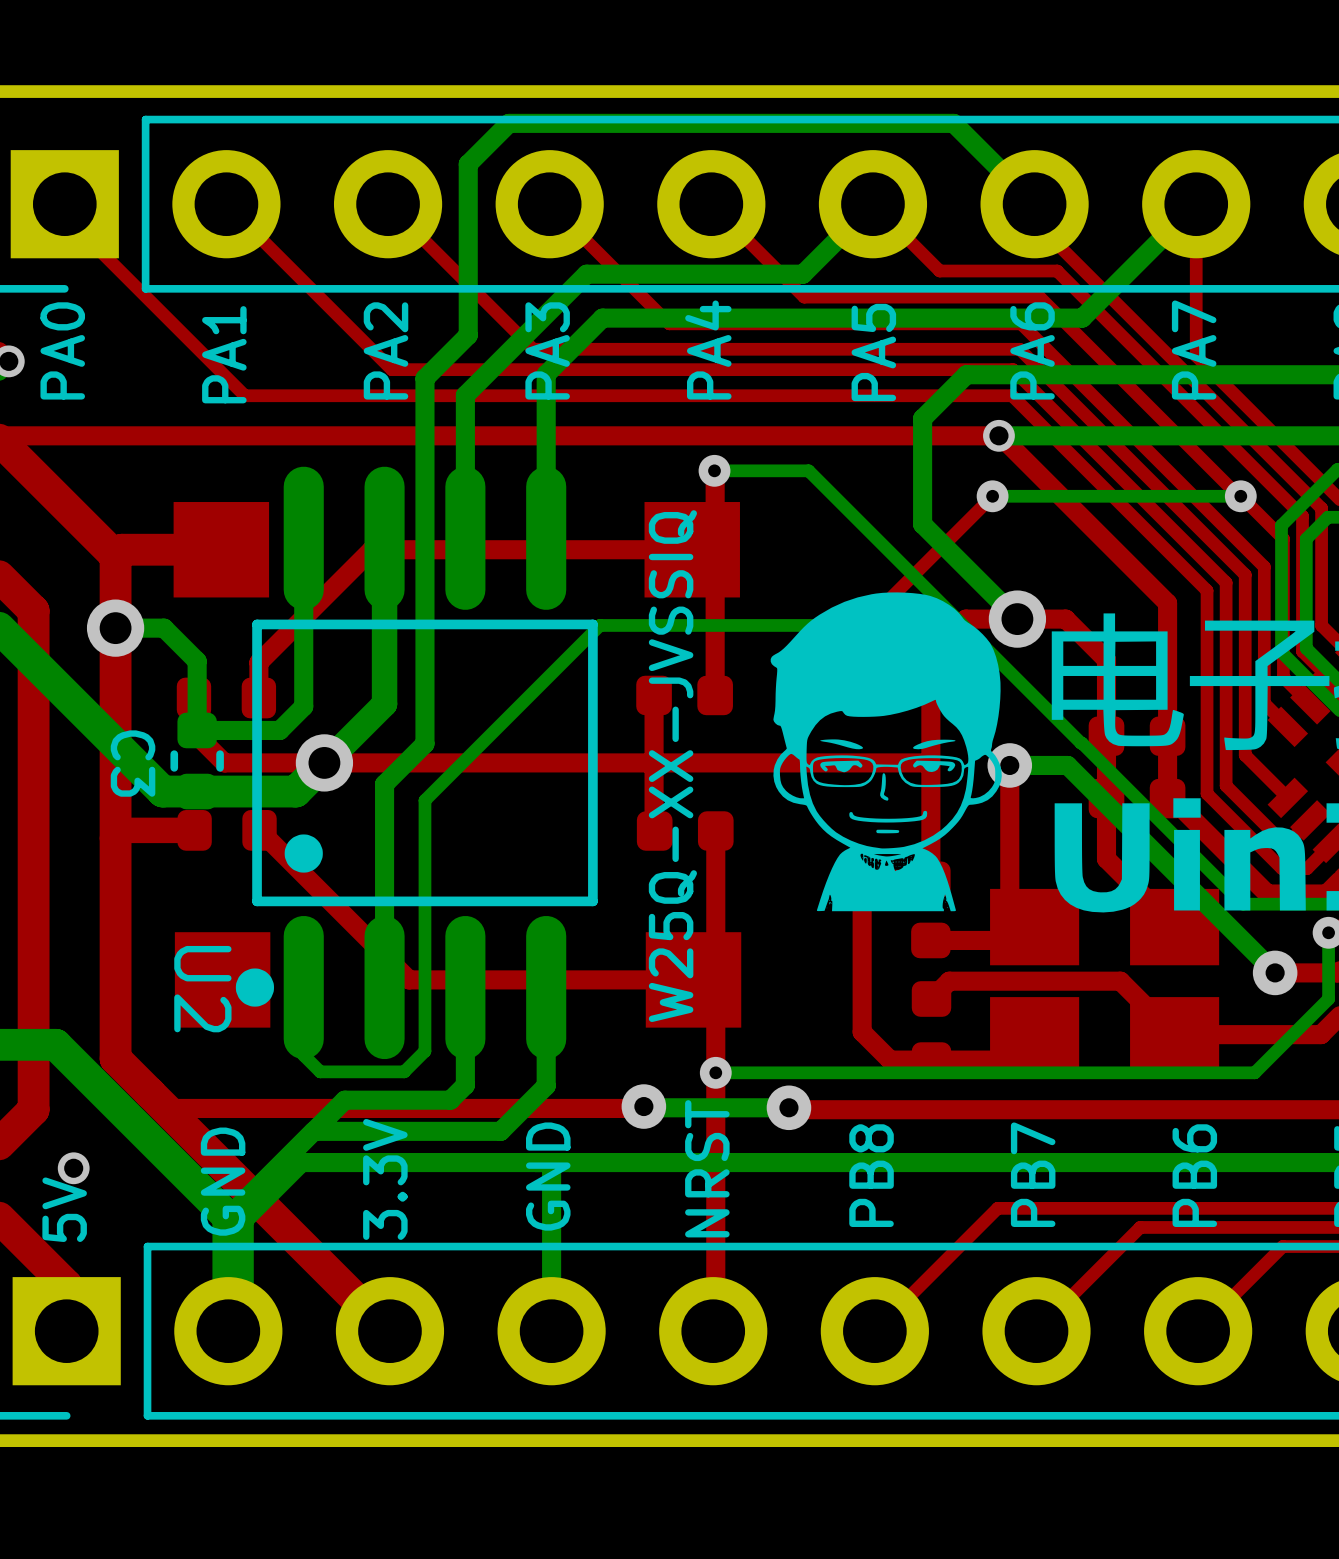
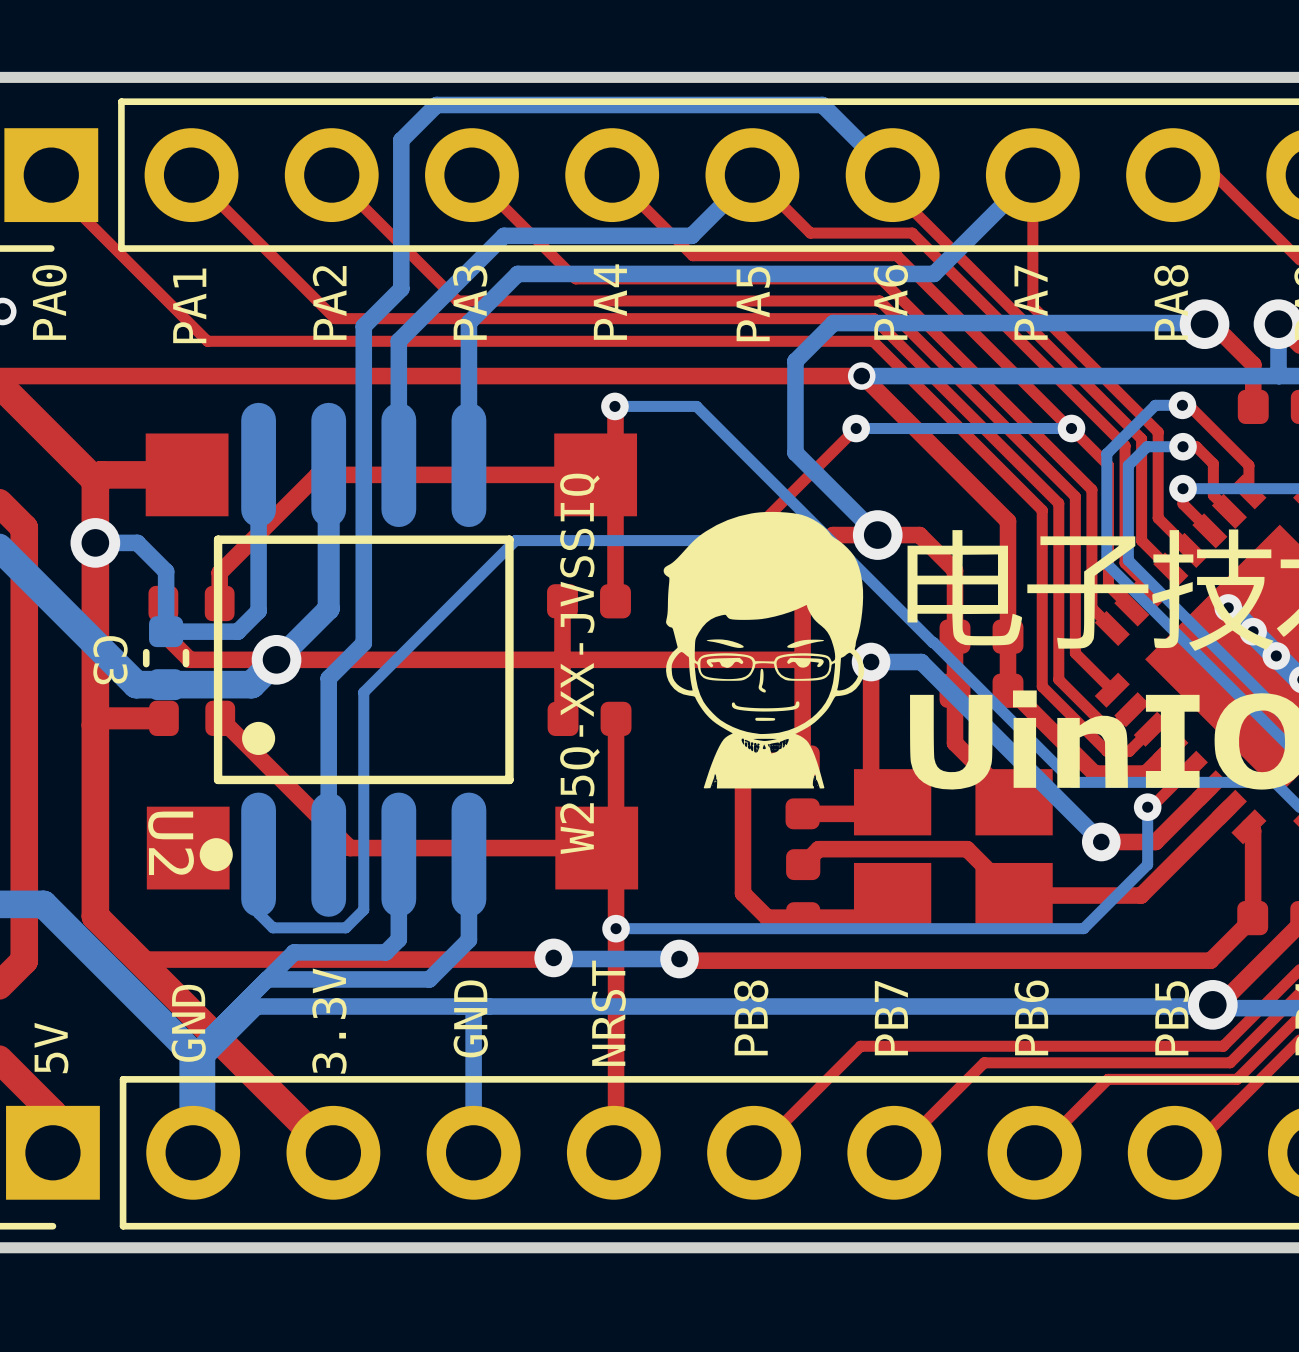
via: (73, 1168) -> none

